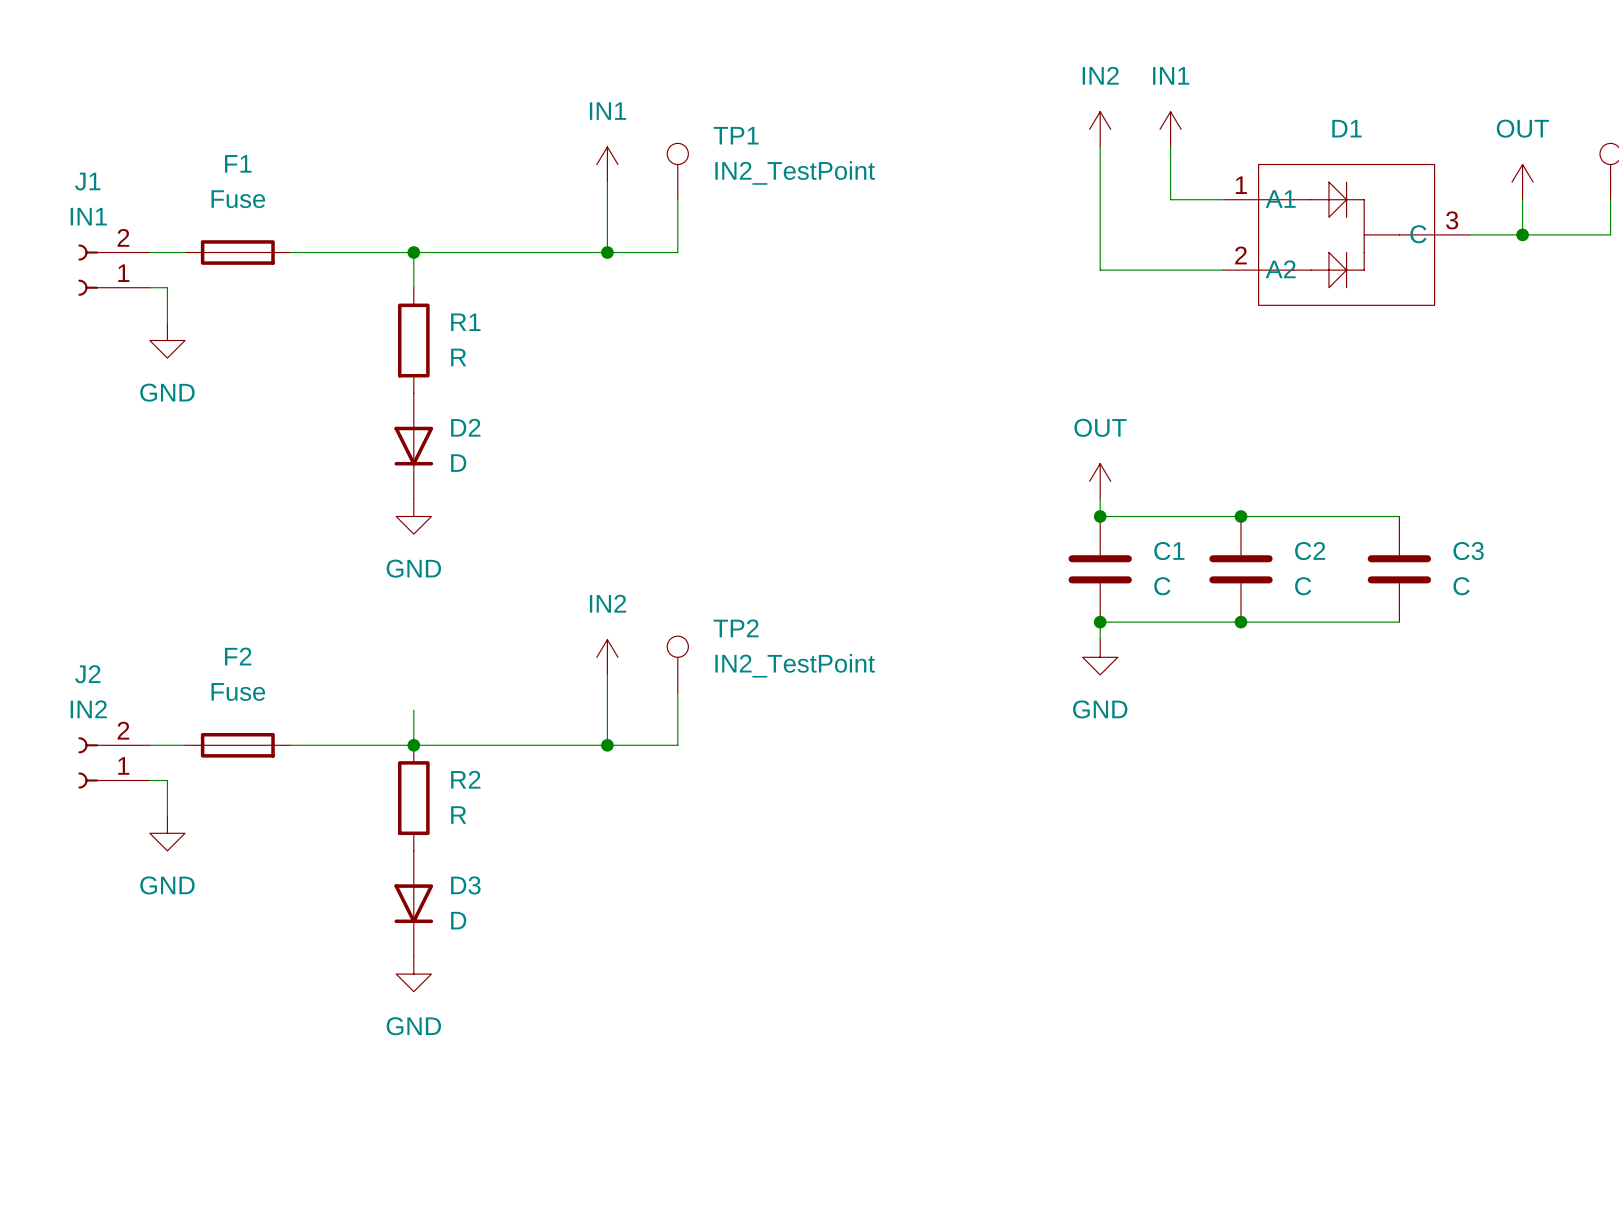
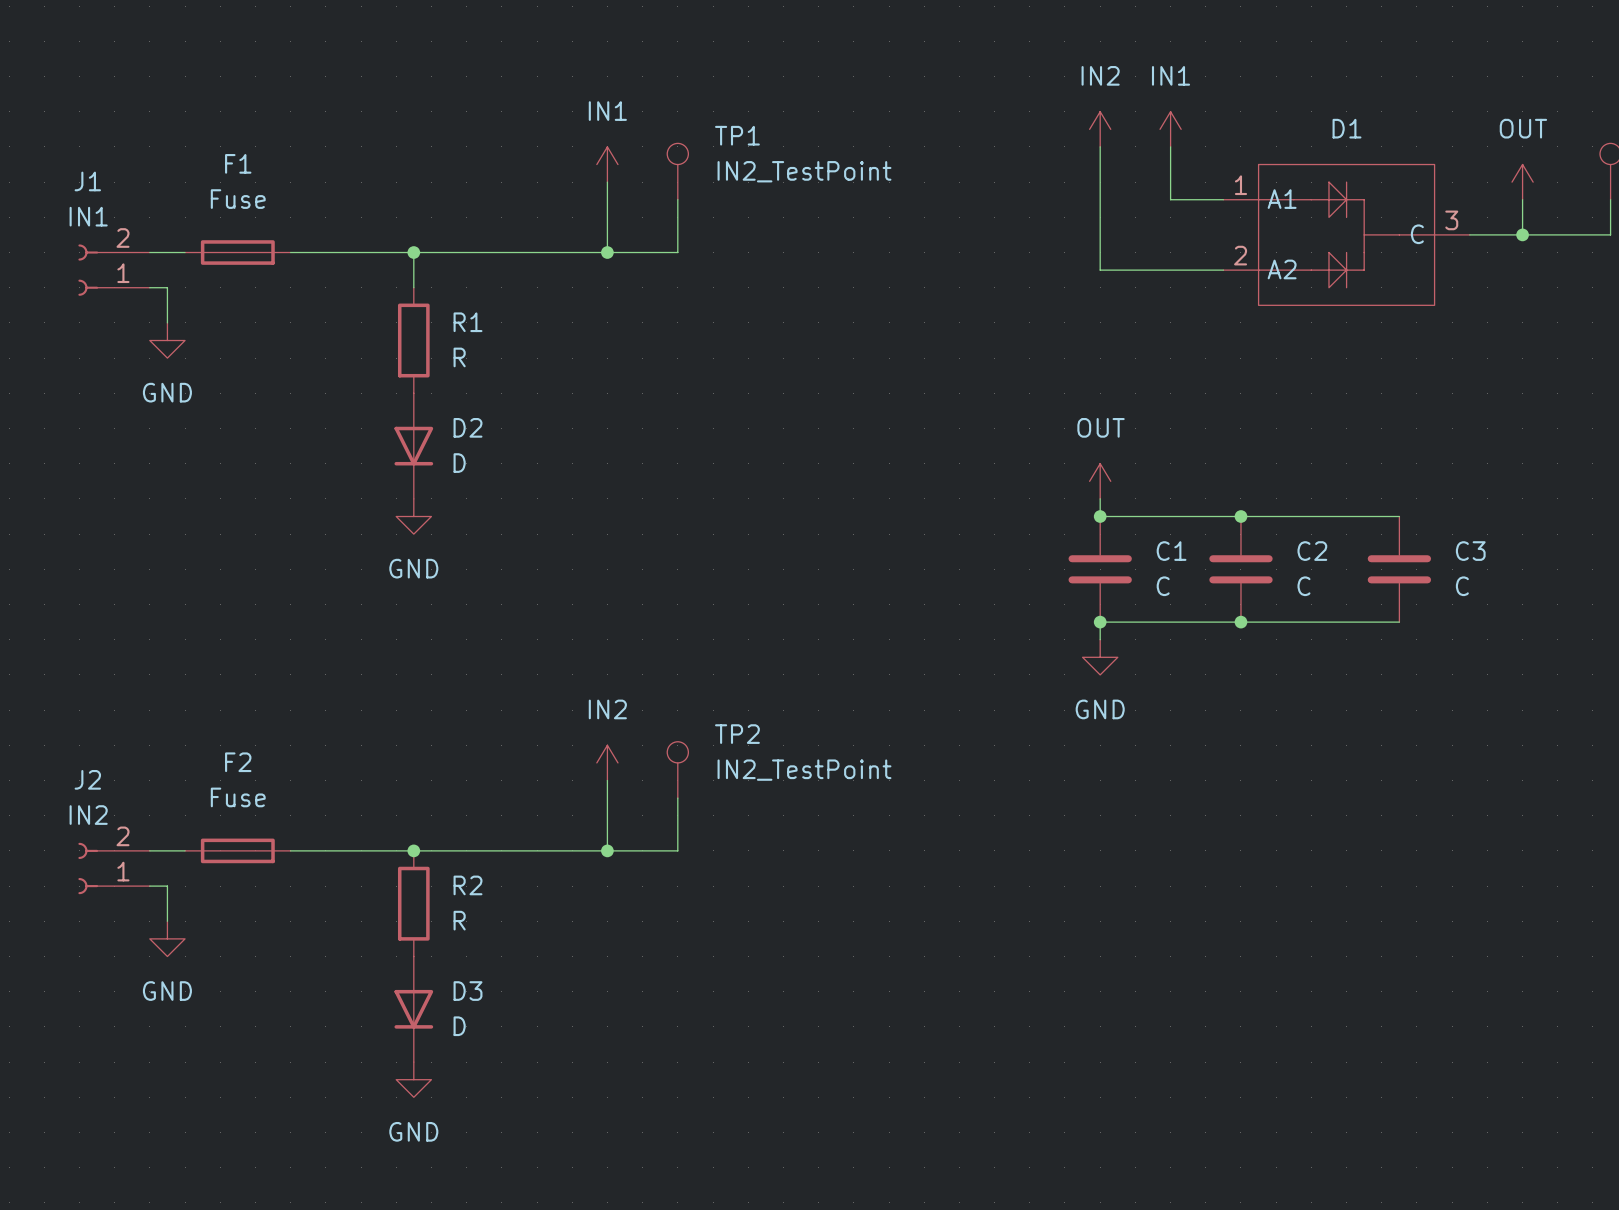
power symbol position: IN2 (607, 657) -> IN2 (607, 762)
TP2 position: (677, 664) -> (677, 769)
wire: (607, 674) (607, 745) -> (607, 780) (607, 850)
wire: (677, 692) (677, 745) (290, 745) -> (677, 798) (677, 850) (290, 850)
wire: (413, 710) (413, 745) -> none
wire: (149, 745) (185, 745) -> (149, 850) (185, 850)
F2 position: (237, 745) -> (237, 850)
junction: (413, 745) -> none
junction: (607, 745) -> none
J2 position: (114, 762) -> (114, 868)
wire: (149, 780) (167, 780) (167, 815) -> (149, 886) (167, 886) (167, 921)
R2 position: (413, 798) -> (413, 903)
power symbol position: GND (167, 833) -> GND (167, 938)
junction: none -> (413, 850)
junction: none -> (607, 850)
D3 position: (413, 903) -> (413, 1009)
power symbol position: GND (413, 974) -> GND (413, 1079)

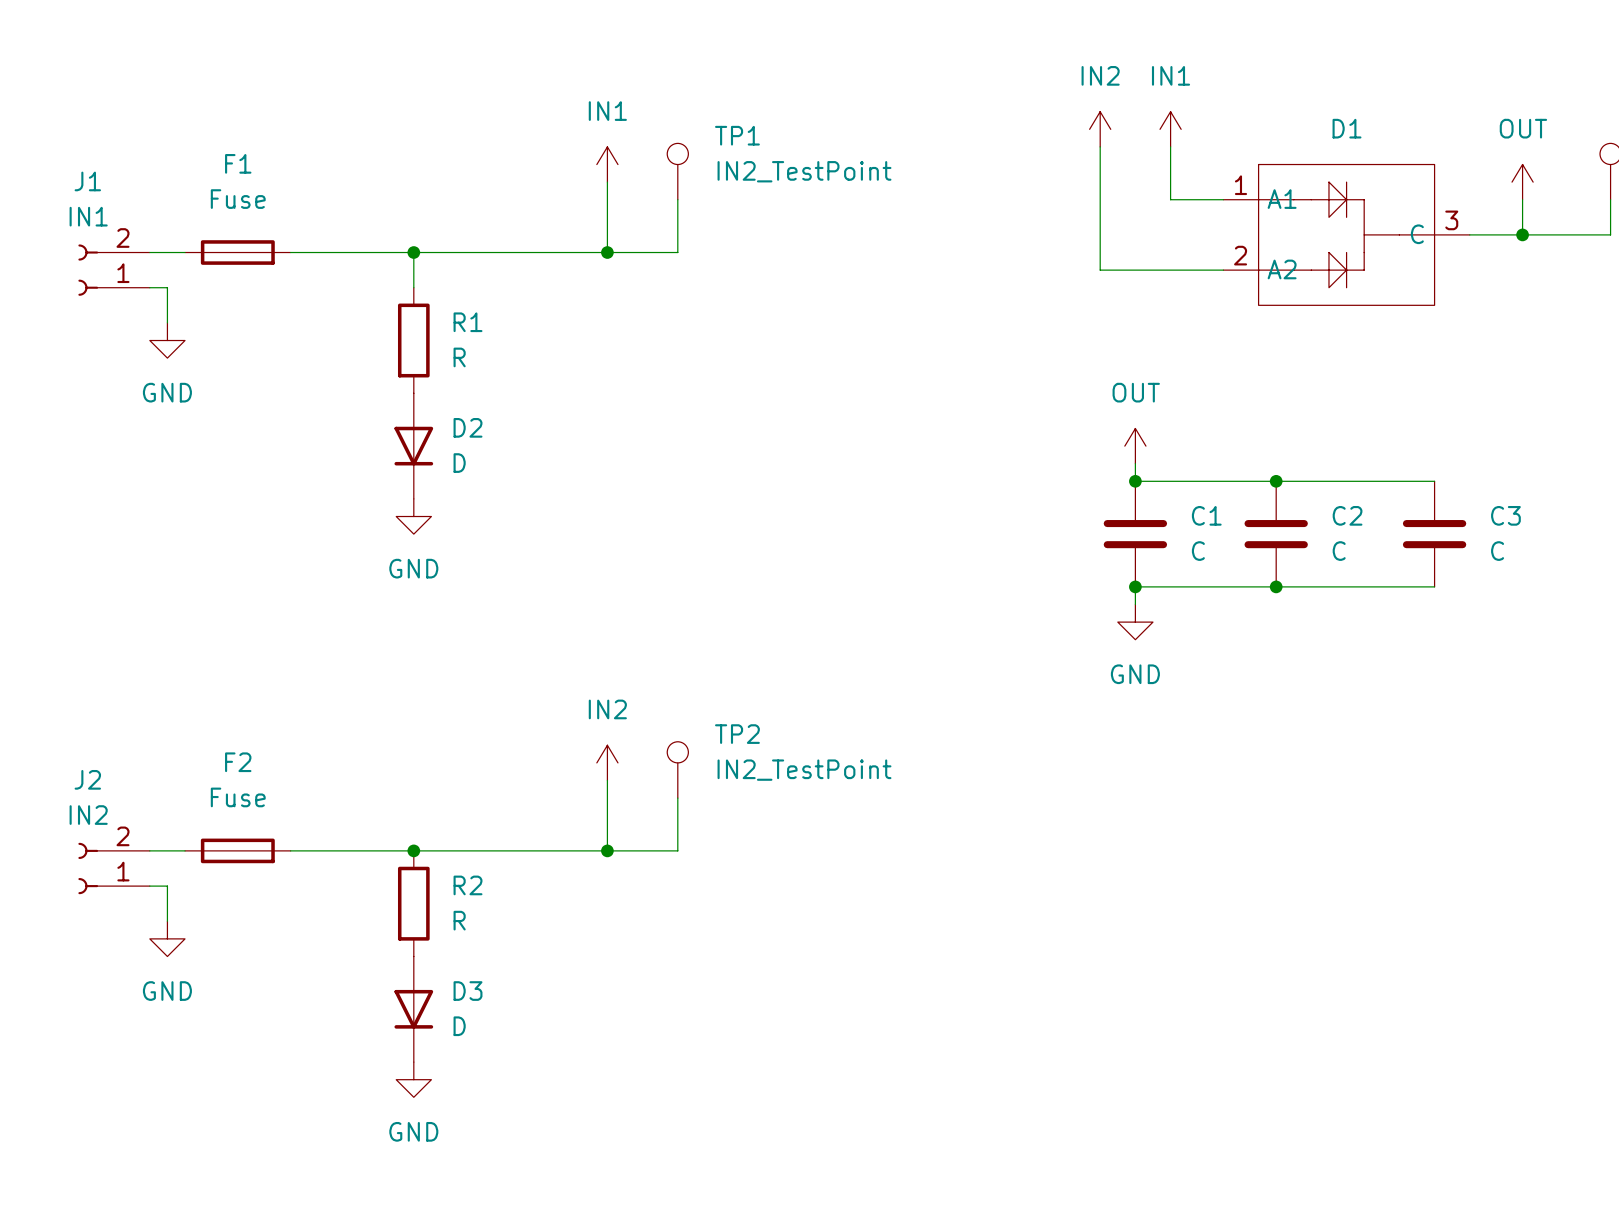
power symbol position: OUT (1100, 481) -> OUT (1135, 446)
junction: none -> (1135, 481)
junction: none -> (1276, 481)
wire: (1100, 498) (1100, 516) (1399, 516) -> (1135, 463) (1135, 481) (1434, 481)
junction: (1100, 516) -> none
junction: (1240, 516) -> none
C1 position: (1100, 569) -> (1135, 534)
C2 position: (1240, 569) -> (1276, 534)
C3 position: (1399, 569) -> (1434, 534)
junction: none -> (1135, 586)
junction: none -> (1276, 586)
junction: (1100, 622) -> none
junction: (1240, 622) -> none
wire: (1399, 622) (1100, 622) (1100, 639) -> (1434, 586) (1135, 586) (1135, 604)
power symbol position: GND (1100, 657) -> GND (1135, 622)

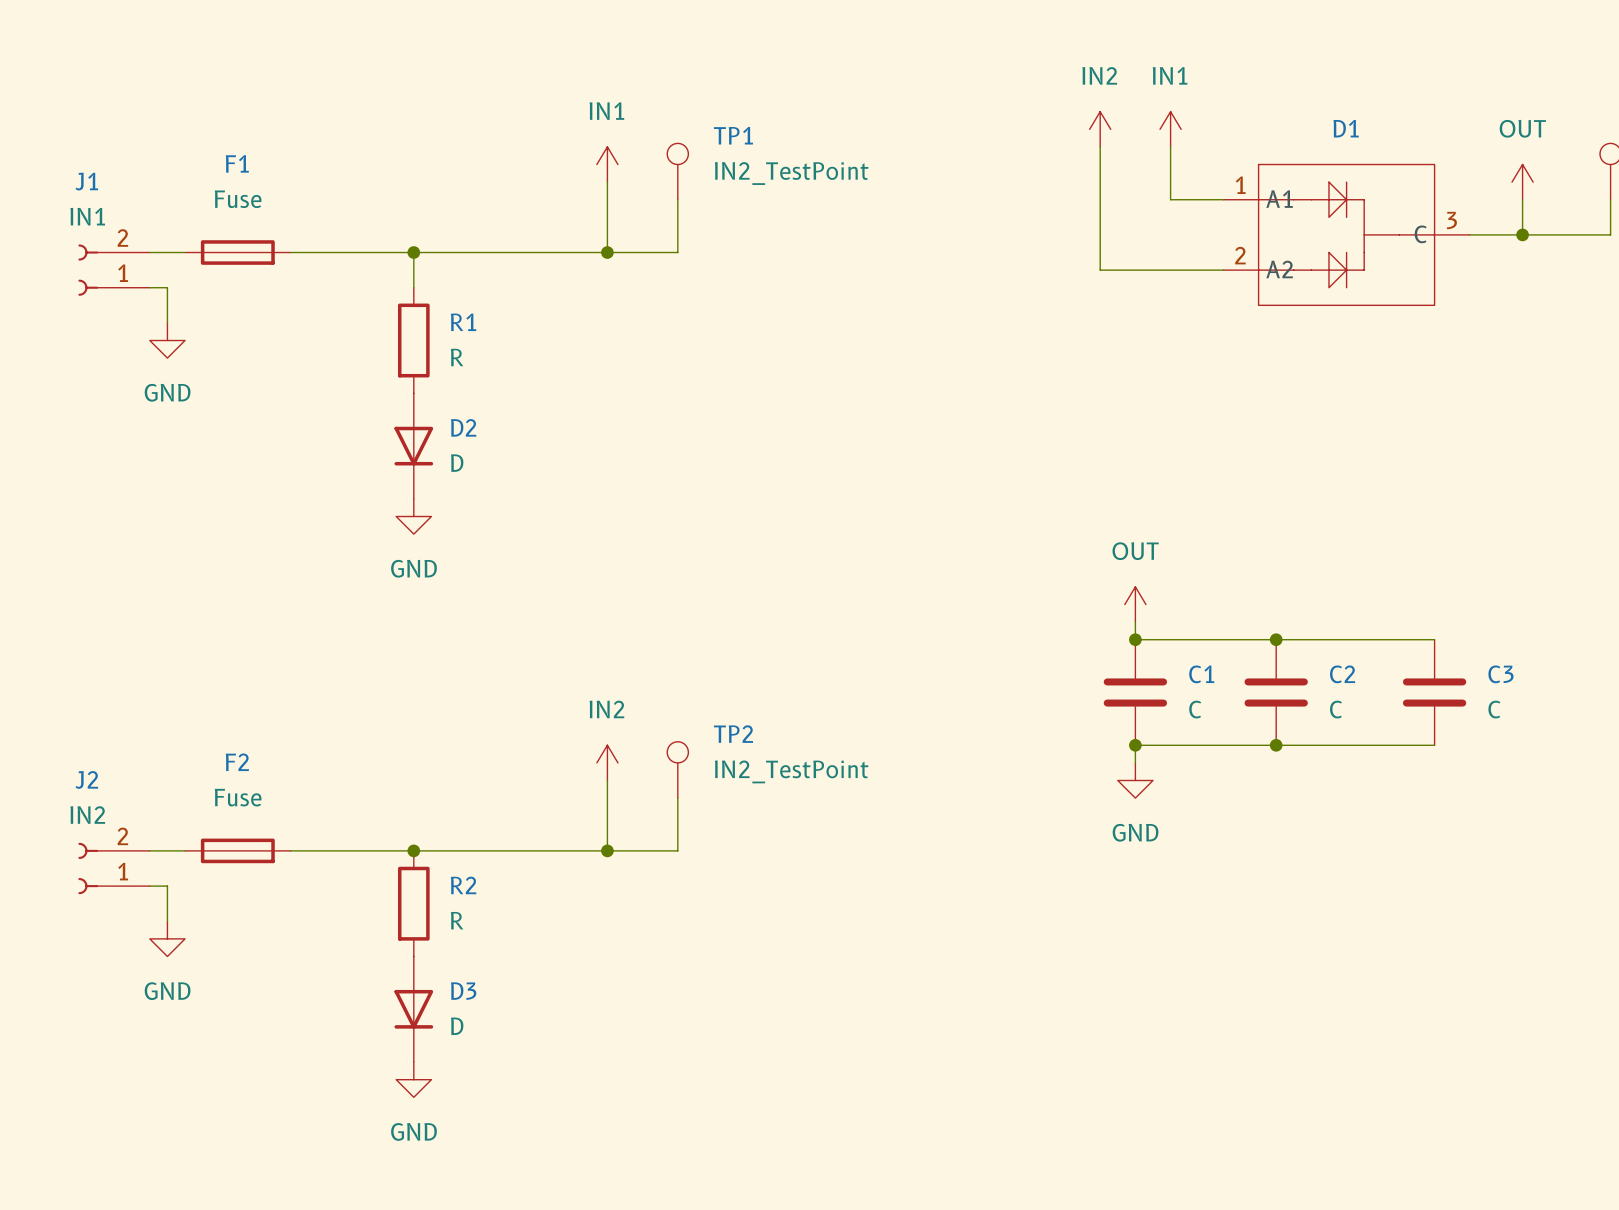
power symbol position: OUT (1135, 446) -> OUT (1135, 604)
wire: (1135, 463) (1135, 481) (1434, 481) -> (1135, 622) (1135, 639) (1434, 639)
junction: (1135, 481) -> none
junction: (1276, 481) -> none
C1 position: (1135, 534) -> (1135, 692)
C2 position: (1276, 534) -> (1276, 692)
C3 position: (1434, 534) -> (1434, 692)
junction position: (1135, 586) -> (1135, 639)
junction position: (1276, 586) -> (1276, 639)
wire: (1434, 586) (1135, 586) (1135, 604) -> (1434, 745) (1135, 745) (1135, 762)
power symbol position: GND (1135, 622) -> GND (1135, 780)
junction: none -> (1135, 745)
junction: none -> (1276, 745)

